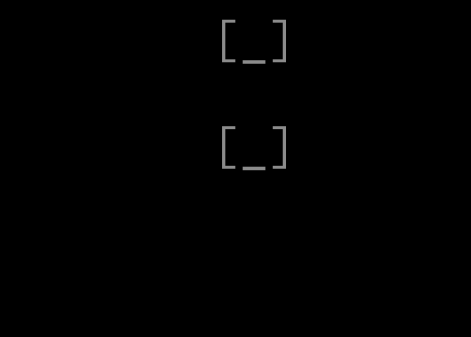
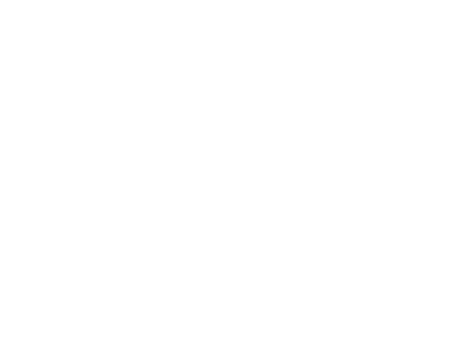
text: [_] (254, 41) -> none
text: [_] (254, 148) -> none

